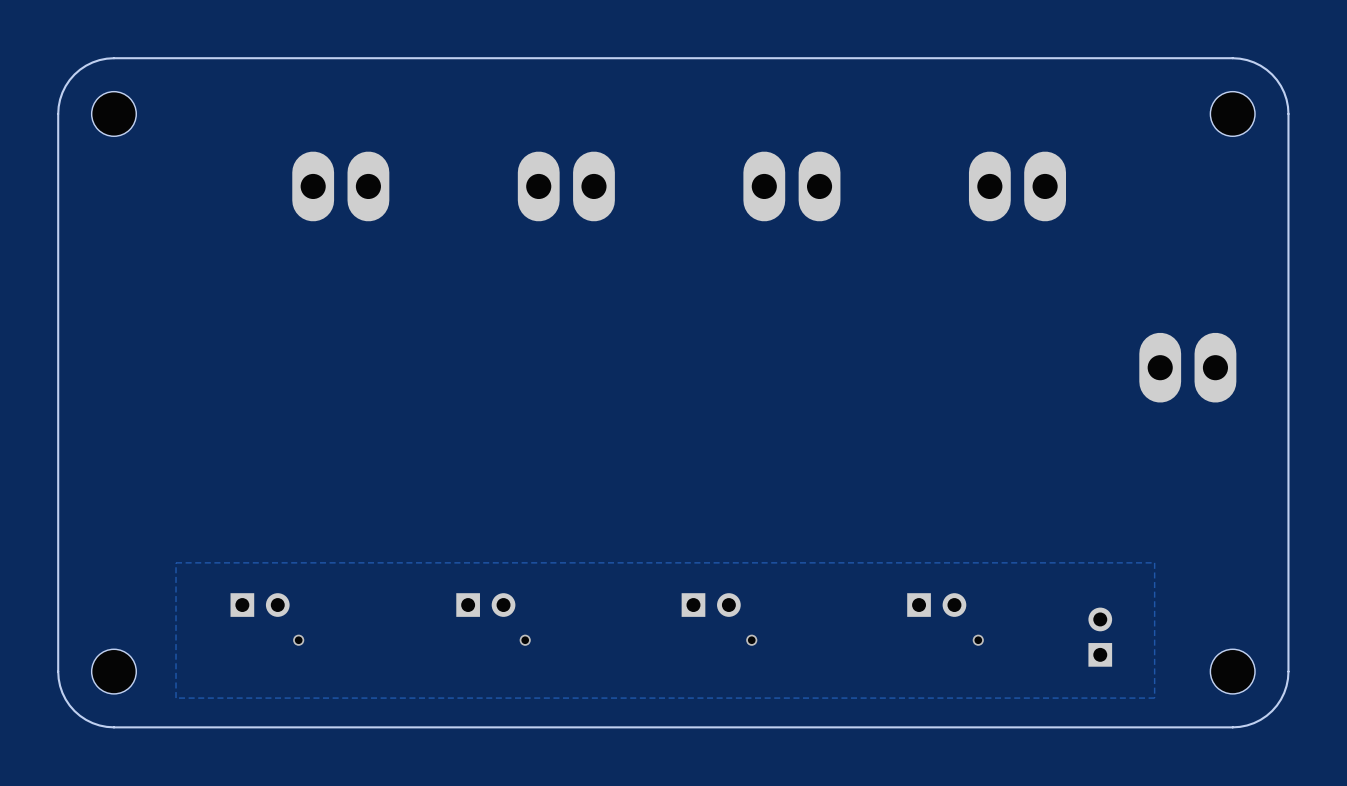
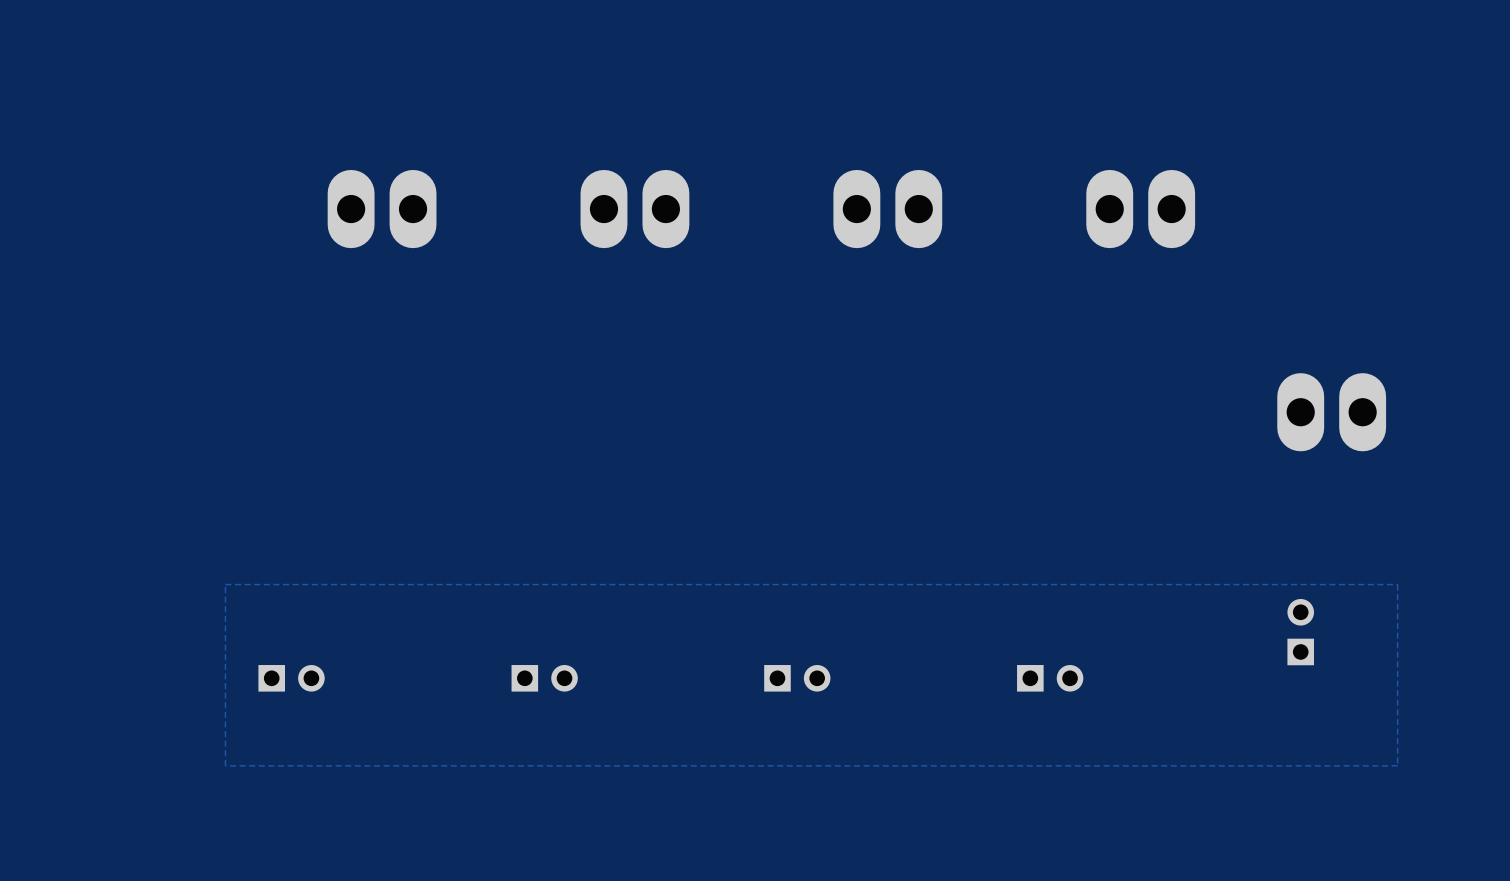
board edge: (1232, 58) (113, 58) (99, 60) (86, 65) (74, 74) (65, 86) (60, 99) (58, 113) (58, 671) (60, 686) (65, 699) (74, 711) (86, 719) (99, 725) (113, 727) (1232, 727) (1247, 725) (1260, 719) (1272, 711) (1280, 699) (1286, 686) (1288, 671) (1288, 113) (1284, 92) (1272, 74) (1254, 62) (1232, 58) -> none
part: (113, 113) -> none
part: (1232, 113) -> none
zone outline: (1154, 562) (1154, 698) (176, 698) (176, 562) (1154, 562) -> (1397, 584) (1397, 765) (225, 765) (225, 584) (1397, 584)
part position: (1100, 637) -> (1300, 632)
via: (298, 640) -> none
via: (525, 640) -> none
via: (751, 640) -> none
via: (978, 640) -> none
part: (113, 671) -> none
part: (1232, 671) -> none

